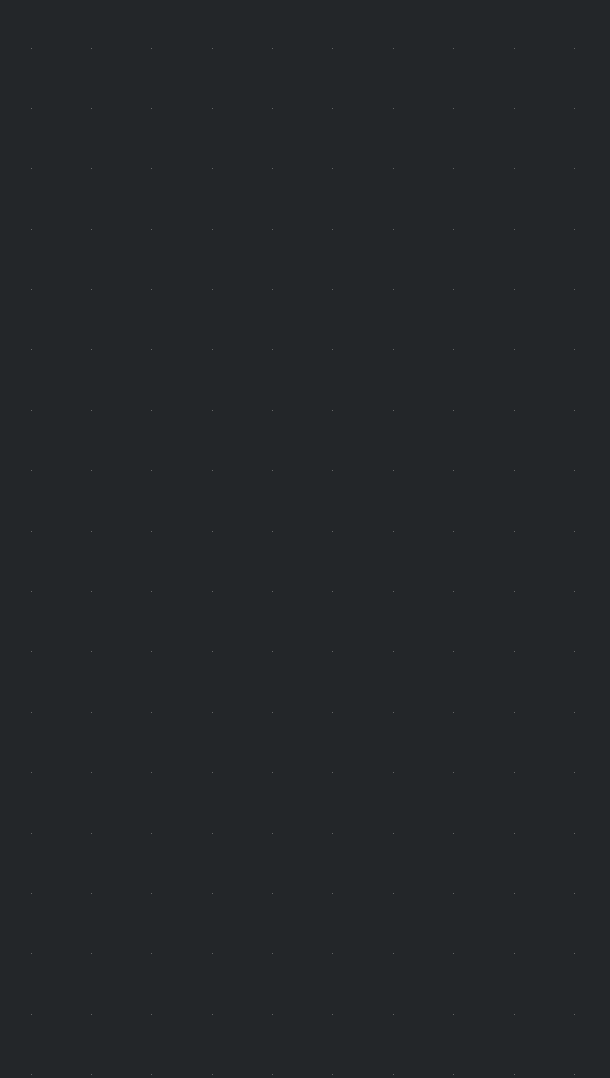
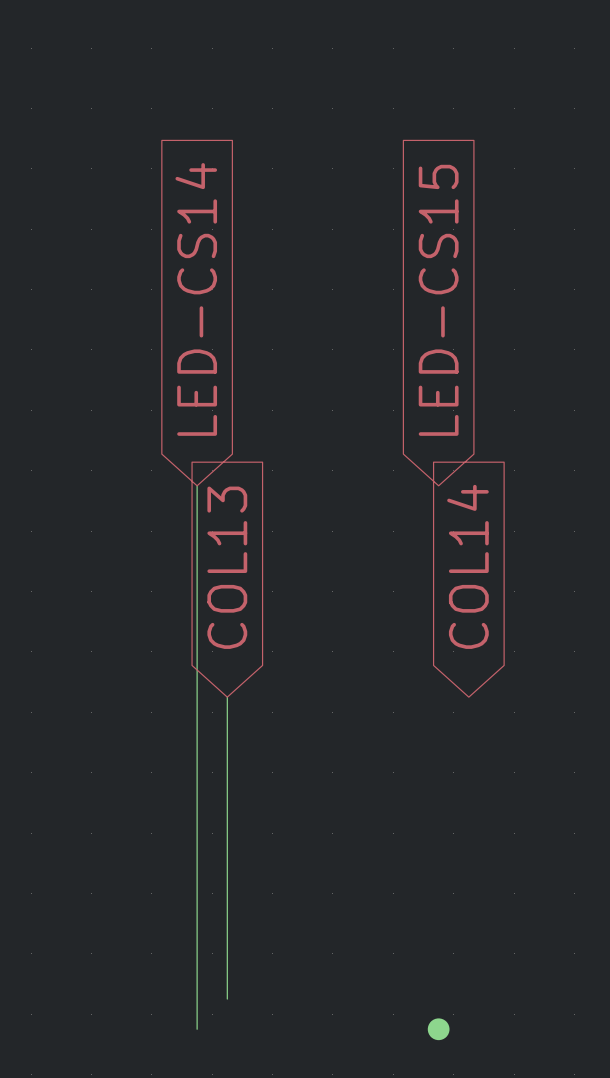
global label: none -> LED-CS14 (196, 299)
global label: none -> LED-CS15 (438, 300)
wire: none -> (197, 485) (197, 1029)
global label: none -> COL14 (467, 566)
global label: none -> COL13 (227, 567)
wire: none -> (227, 697) (227, 999)
junction: none -> (438, 1029)

